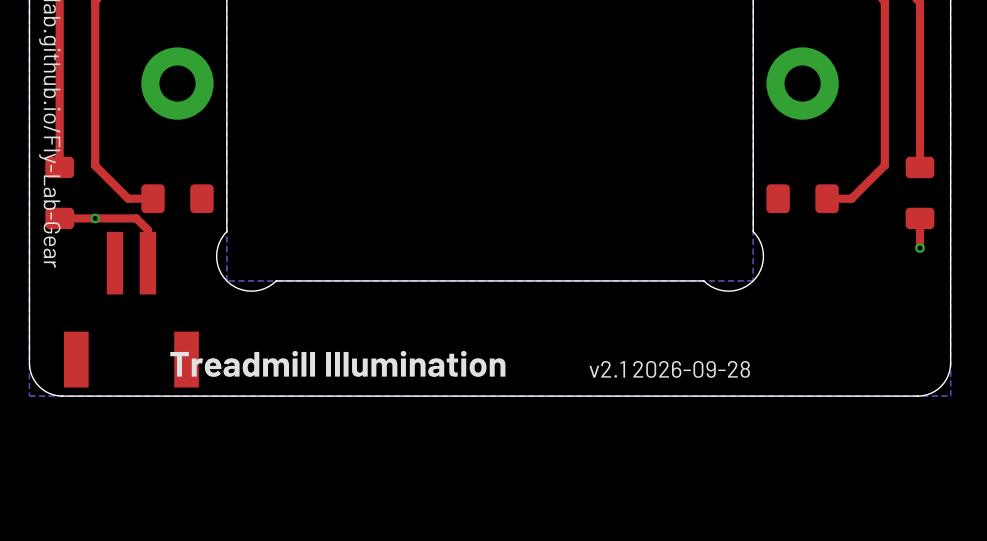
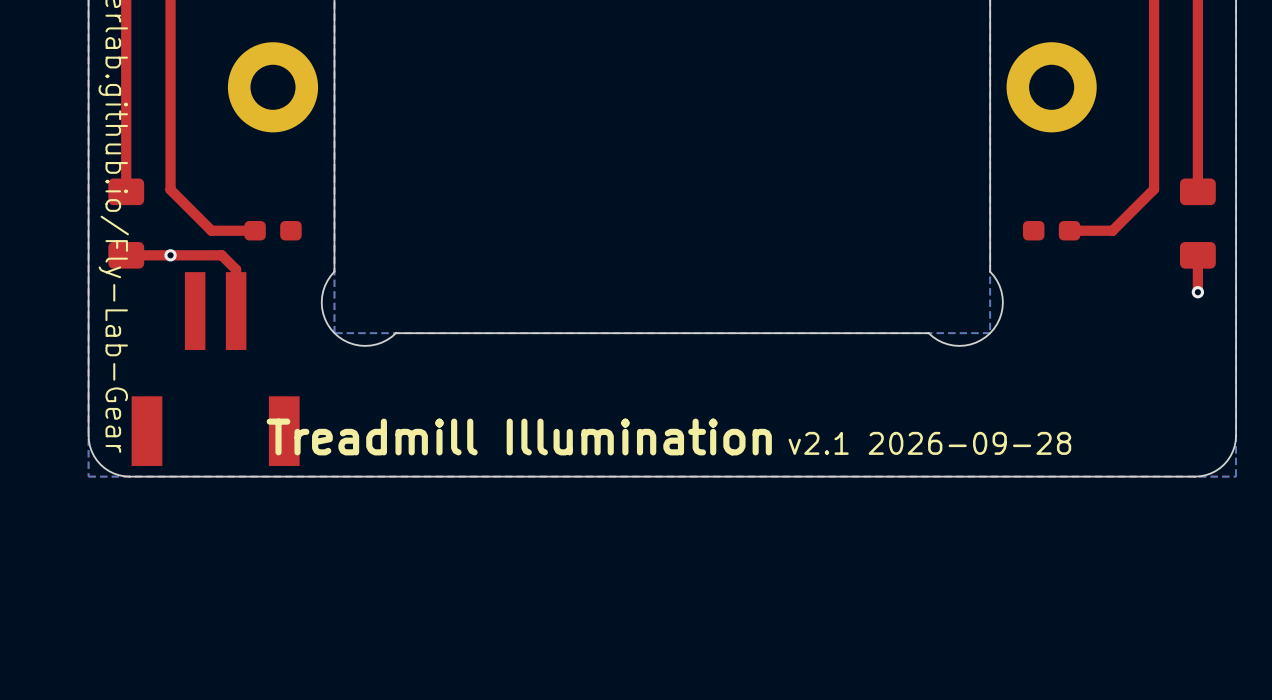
part footprint: [141, 184, 214, 214] -> [244, 221, 302, 241]
part footprint: [766, 184, 839, 214] -> [1022, 221, 1081, 241]

